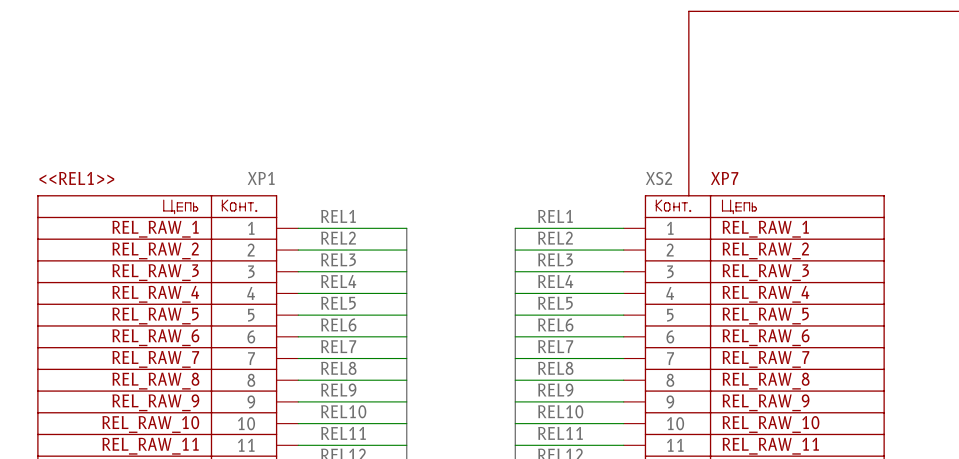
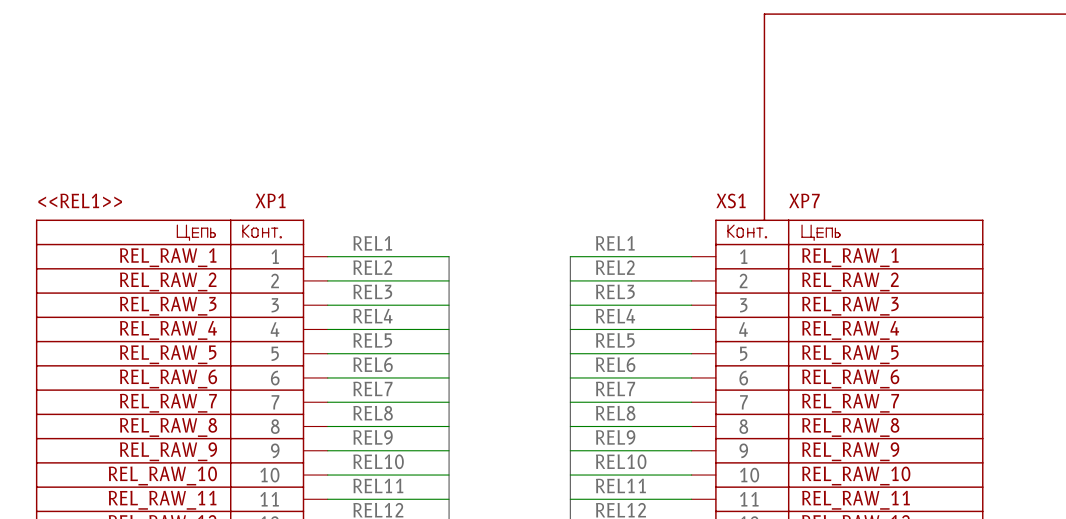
text: none -> XP1 (270, 200)
XP1 name: XP1 (261, 178) -> none
XS2 name: XS2 (658, 178) -> none
text: none -> XS1 (731, 200)

